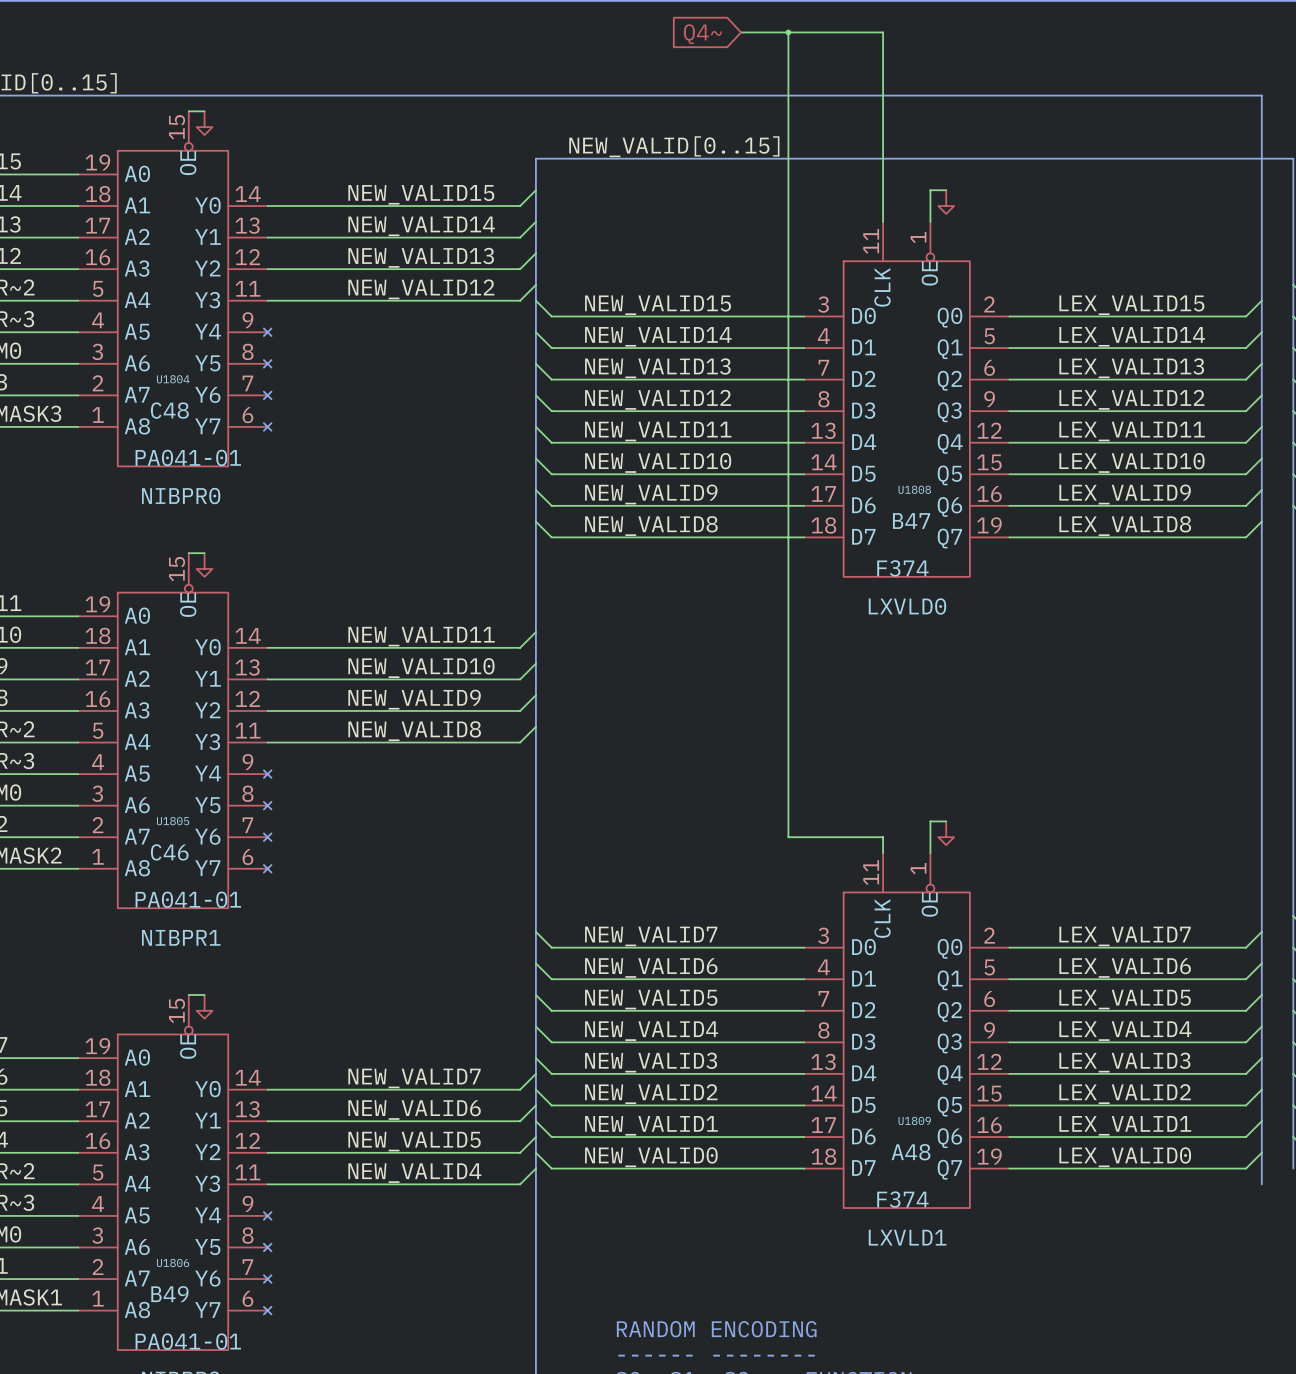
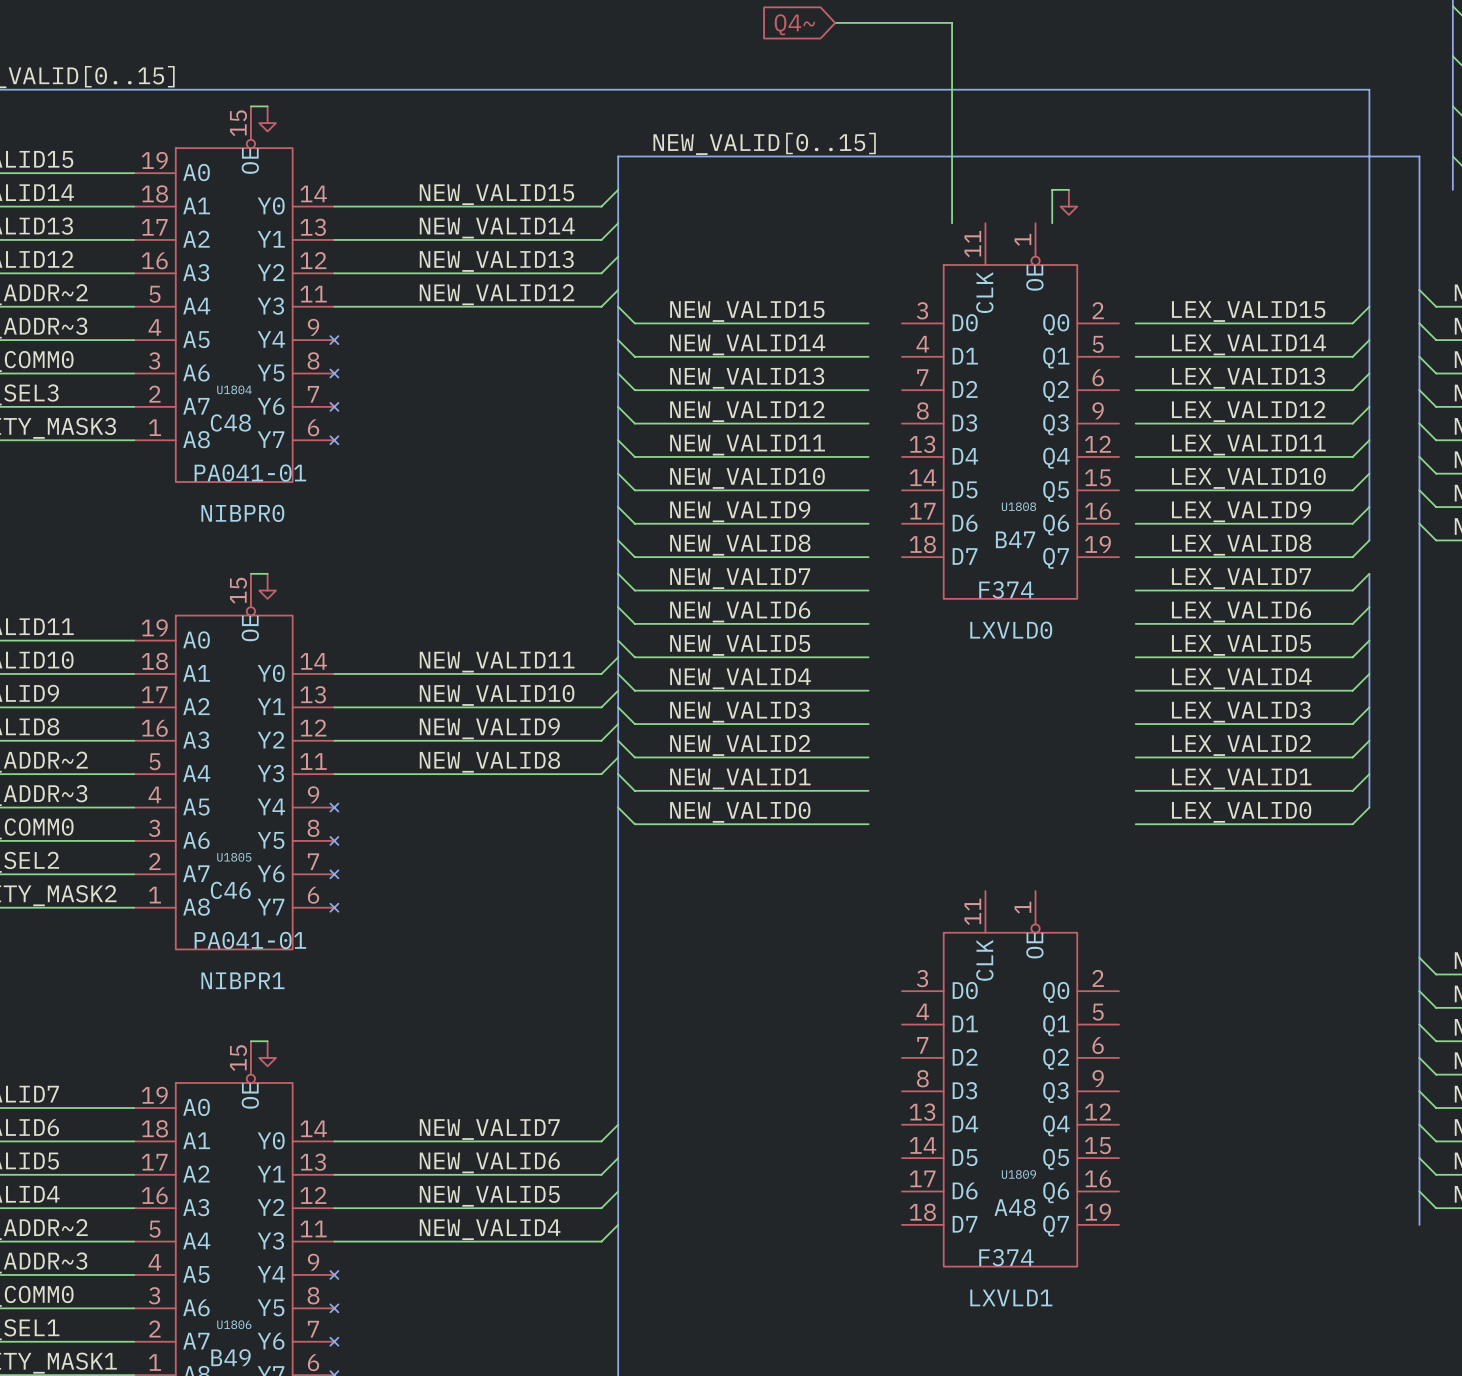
wire: (788, 32) (788, 837) (883, 837) (883, 852) -> none
junction: (788, 32) -> none
wire: (851, 32) (883, 32) (883, 221) -> (952, 22) (952, 223)
bus: (1246, 95) (1261, 95) (1261, 1184) -> (1369, 89) (1369, 540)
wire: (946, 190) (930, 190) (930, 221) -> (1068, 189) (1052, 189) (1052, 223)
power symbol position: (946, 202) -> (1068, 202)
wire: (1261, 300) (1246, 316) (1230, 316) -> (1369, 306) (1352, 323)
wire: (772, 316) (804, 316) -> none
wire: (1009, 316) (1025, 316) -> none
wire: (1261, 332) (1246, 348) (1230, 348) -> (1369, 340) (1352, 356)
wire: (772, 348) (804, 348) -> none
wire: (1009, 348) (1025, 348) -> none
wire: (1261, 363) (1246, 379) (1230, 379) -> (1369, 373) (1352, 390)
wire: (772, 379) (804, 379) -> none
wire: (1009, 379) (1025, 379) -> none
wire: (1261, 395) (1246, 411) (1230, 411) -> (1369, 406) (1352, 423)
wire: (772, 411) (804, 411) -> none
wire: (1009, 411) (1025, 411) -> none
wire: (1261, 426) (1246, 442) (1230, 442) -> (1369, 440) (1352, 456)
wire: (772, 442) (804, 442) -> none
wire: (1009, 442) (1025, 442) -> none
wire: (1261, 458) (1246, 474) (1230, 474) -> (1369, 473) (1352, 490)
wire: (772, 474) (804, 474) -> none
wire: (1009, 474) (1025, 474) -> none
wire: (1261, 490) (1246, 505) (1230, 505) -> (1369, 507) (1352, 523)
wire: (772, 505) (804, 505) -> none
wire: (1009, 505) (1025, 505) -> none
wire: (1261, 521) (1246, 537) (1230, 537) -> (1369, 540) (1352, 557)
wire: (772, 537) (804, 537) -> none
wire: (1009, 537) (1025, 537) -> none
wire: none -> (618, 573) (634, 590) (868, 590)
bus: none -> (1369, 573) (1369, 807)
wire: none -> (1369, 573) (1352, 590) (1135, 590)
label: none -> NEW_VALID7 (740, 578)
label: none -> LEX_VALID7 (1241, 578)
wire: none -> (618, 607) (634, 623) (868, 623)
wire: none -> (1369, 607) (1352, 623) (1135, 623)
label: none -> NEW_VALID6 (740, 612)
label: none -> LEX_VALID6 (1241, 612)
wire: none -> (618, 640) (634, 657) (868, 657)
wire: none -> (1369, 640) (1352, 657) (1135, 657)
label: none -> NEW_VALID5 (740, 645)
label: none -> LEX_VALID5 (1241, 645)
wire: none -> (618, 673) (634, 690) (868, 690)
wire: none -> (1369, 673) (1352, 690) (1135, 690)
label: none -> NEW_VALID4 (740, 678)
label: none -> LEX_VALID4 (1241, 678)
wire: none -> (618, 707) (634, 724) (868, 724)
wire: none -> (1369, 707) (1352, 724) (1135, 724)
label: none -> NEW_VALID3 (739, 712)
label: none -> LEX_VALID3 (1241, 712)
wire: none -> (618, 740) (634, 757) (868, 757)
wire: none -> (1369, 740) (1352, 757) (1135, 757)
label: none -> NEW_VALID2 (740, 745)
label: none -> LEX_VALID2 (1241, 745)
wire: none -> (618, 774) (634, 790) (868, 790)
wire: none -> (1369, 774) (1352, 790) (1135, 790)
label: none -> NEW_VALID1 (740, 778)
label: none -> LEX_VALID1 (1241, 778)
wire: none -> (618, 807) (634, 824) (868, 824)
wire: none -> (1369, 807) (1352, 824) (1135, 824)
label: none -> NEW_VALID0 (740, 812)
label: none -> LEX_VALID0 (1241, 812)
wire: (946, 821) (930, 821) (930, 852) -> none
power symbol: (946, 833) -> none
wire: (535, 931) (551, 947) (804, 947) -> none
wire: (1261, 931) (1246, 947) (1009, 947) -> none
label: NEW_VALID7 (651, 936) -> none
label: LEX_VALID7 (1125, 936) -> none
wire: (535, 963) (551, 979) (804, 979) -> none
wire: (1261, 963) (1246, 979) (1009, 979) -> none
label: NEW_VALID6 (651, 968) -> none
label: LEX_VALID6 (1125, 968) -> none
wire: (535, 995) (551, 1010) (804, 1010) -> none
wire: (1261, 995) (1246, 1010) (1009, 1010) -> none
label: NEW_VALID5 (651, 999) -> none
label: LEX_VALID5 (1125, 999) -> none
wire: (535, 1026) (551, 1042) (804, 1042) -> none
wire: (1261, 1026) (1246, 1042) (1009, 1042) -> none
label: NEW_VALID4 (651, 1031) -> none
label: LEX_VALID4 (1125, 1031) -> none
wire: (535, 1058) (551, 1073) (804, 1073) -> none
wire: (1261, 1058) (1246, 1073) (1009, 1073) -> none
label: NEW_VALID3 (651, 1062) -> none
label: LEX_VALID3 (1124, 1062) -> none
wire: (535, 1089) (551, 1105) (804, 1105) -> none
wire: (1261, 1089) (1246, 1105) (1009, 1105) -> none
label: NEW_VALID2 (651, 1094) -> none
label: LEX_VALID2 (1125, 1094) -> none
wire: (535, 1121) (551, 1137) (804, 1137) -> none
wire: (1261, 1121) (1246, 1137) (1009, 1137) -> none
label: NEW_VALID1 (651, 1125) -> none
label: LEX_VALID1 (1125, 1125) -> none
wire: (535, 1152) (551, 1168) (804, 1168) -> none
wire: (1261, 1152) (1246, 1168) (1009, 1168) -> none
label: NEW_VALID0 (651, 1157) -> none
label: LEX_VALID0 (1125, 1157) -> none

